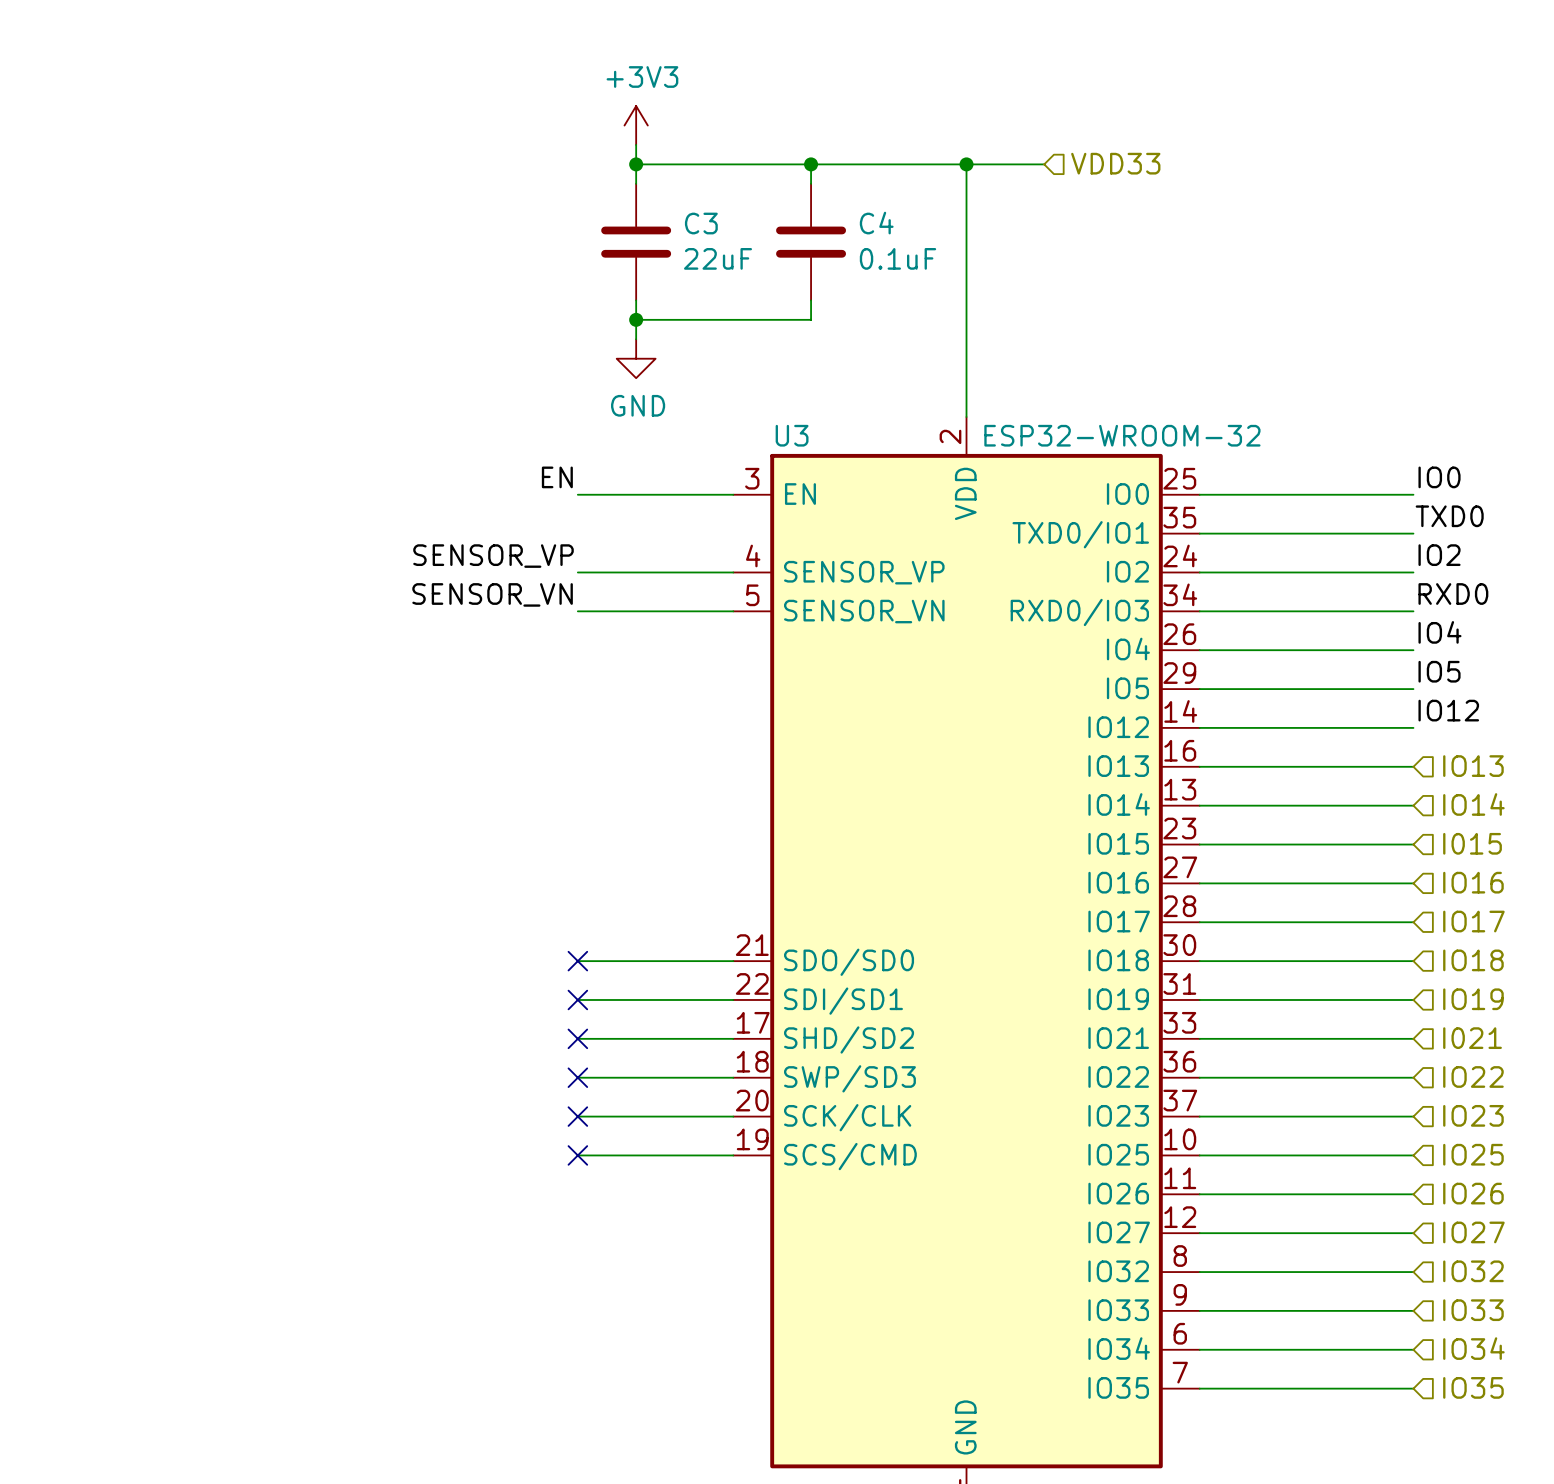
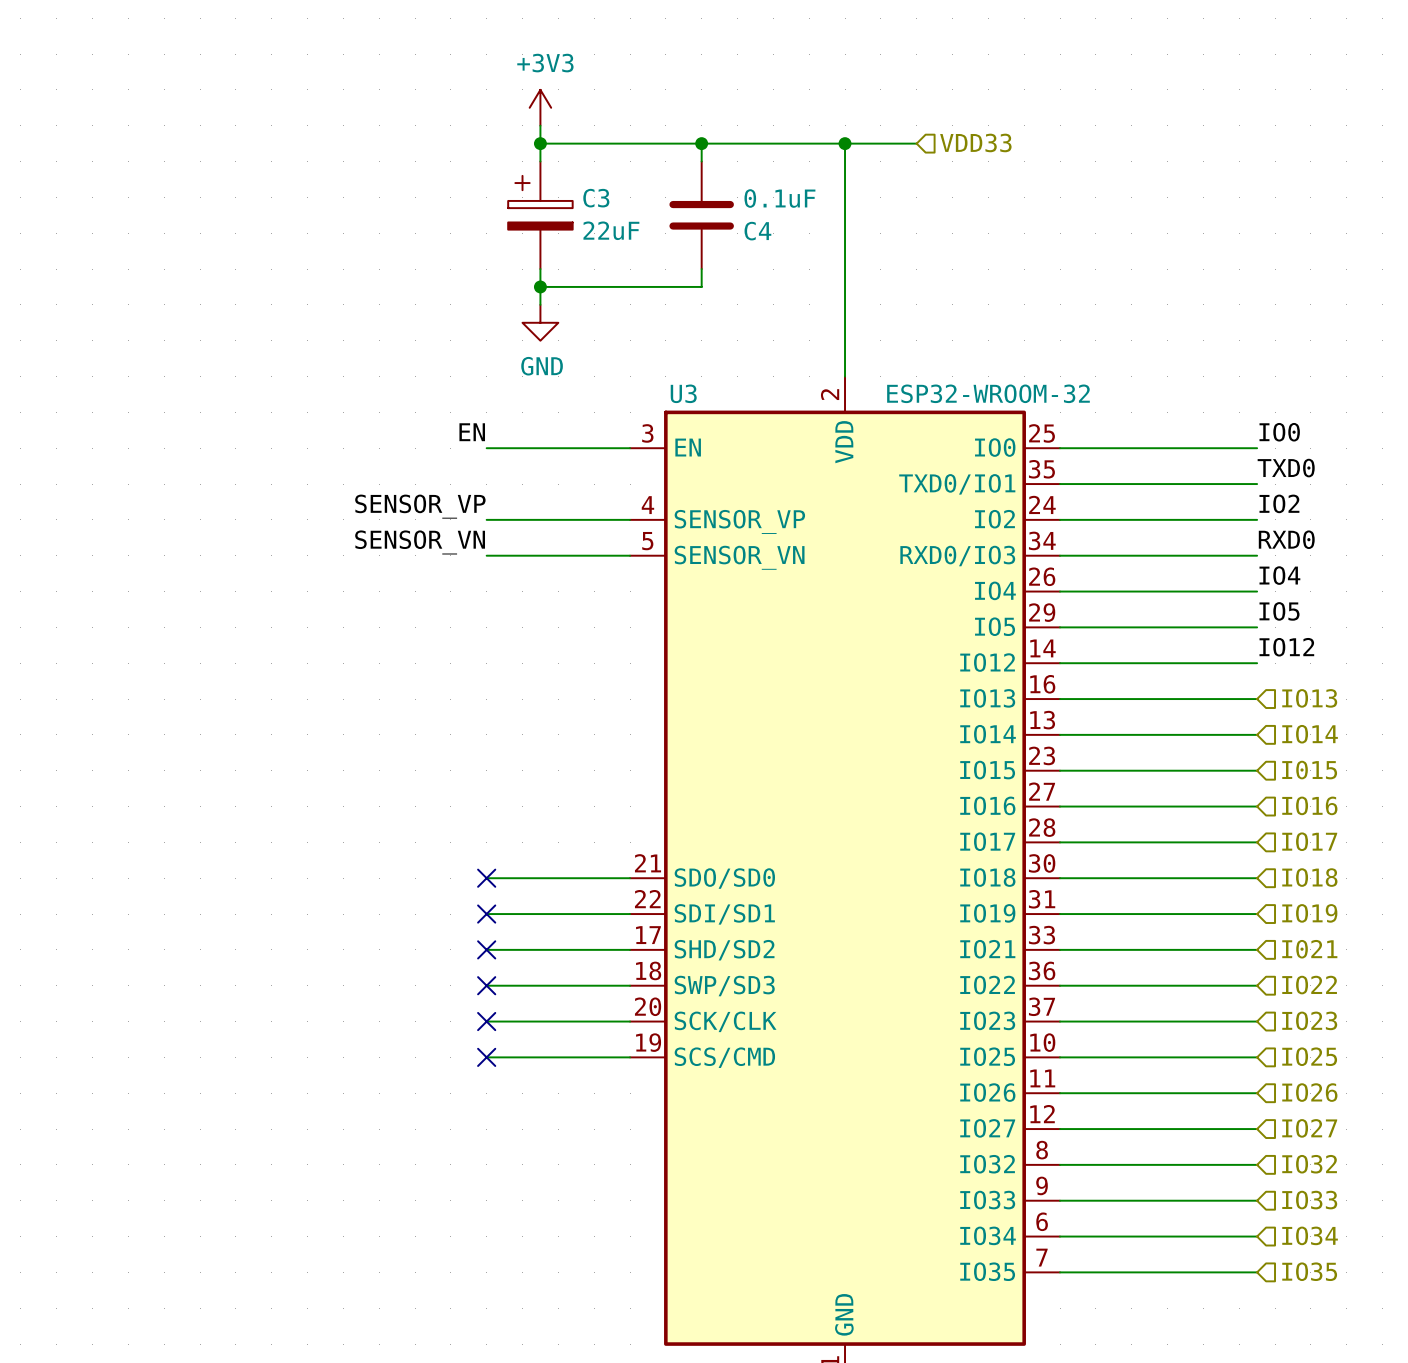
C3 symbol: [601, 183, 672, 301] -> [508, 161, 573, 270]
C4 name position: C4 (876, 223) -> C4 (757, 231)
C4 value position: 0.1uF (897, 258) -> 0.1uF (779, 198)

